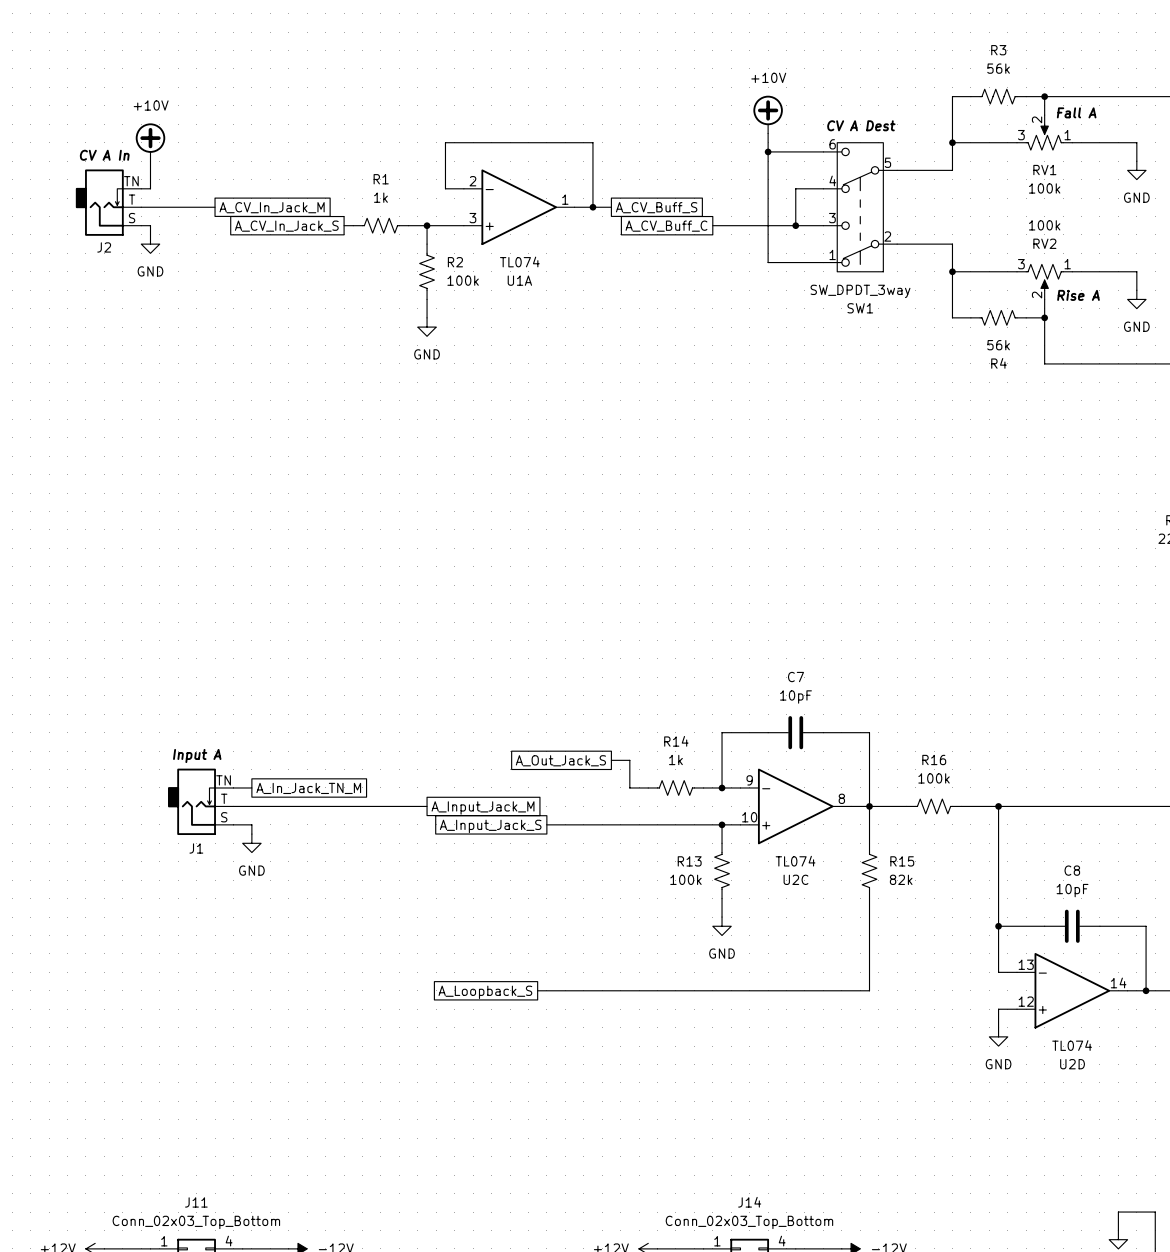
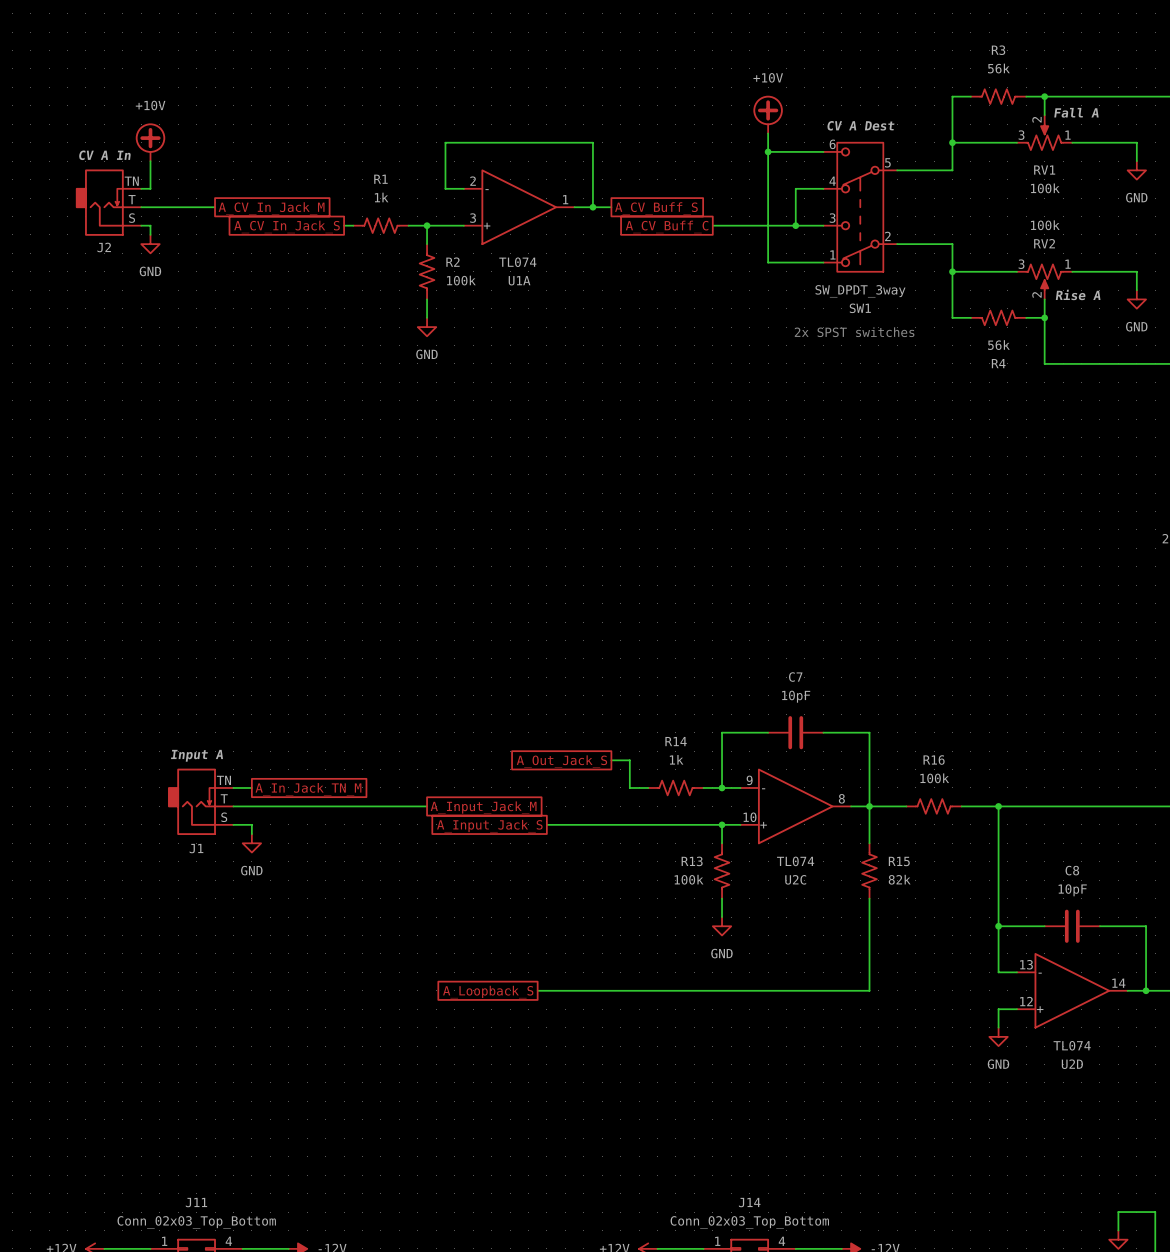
text: none -> 2x SPST switches (854, 332)

